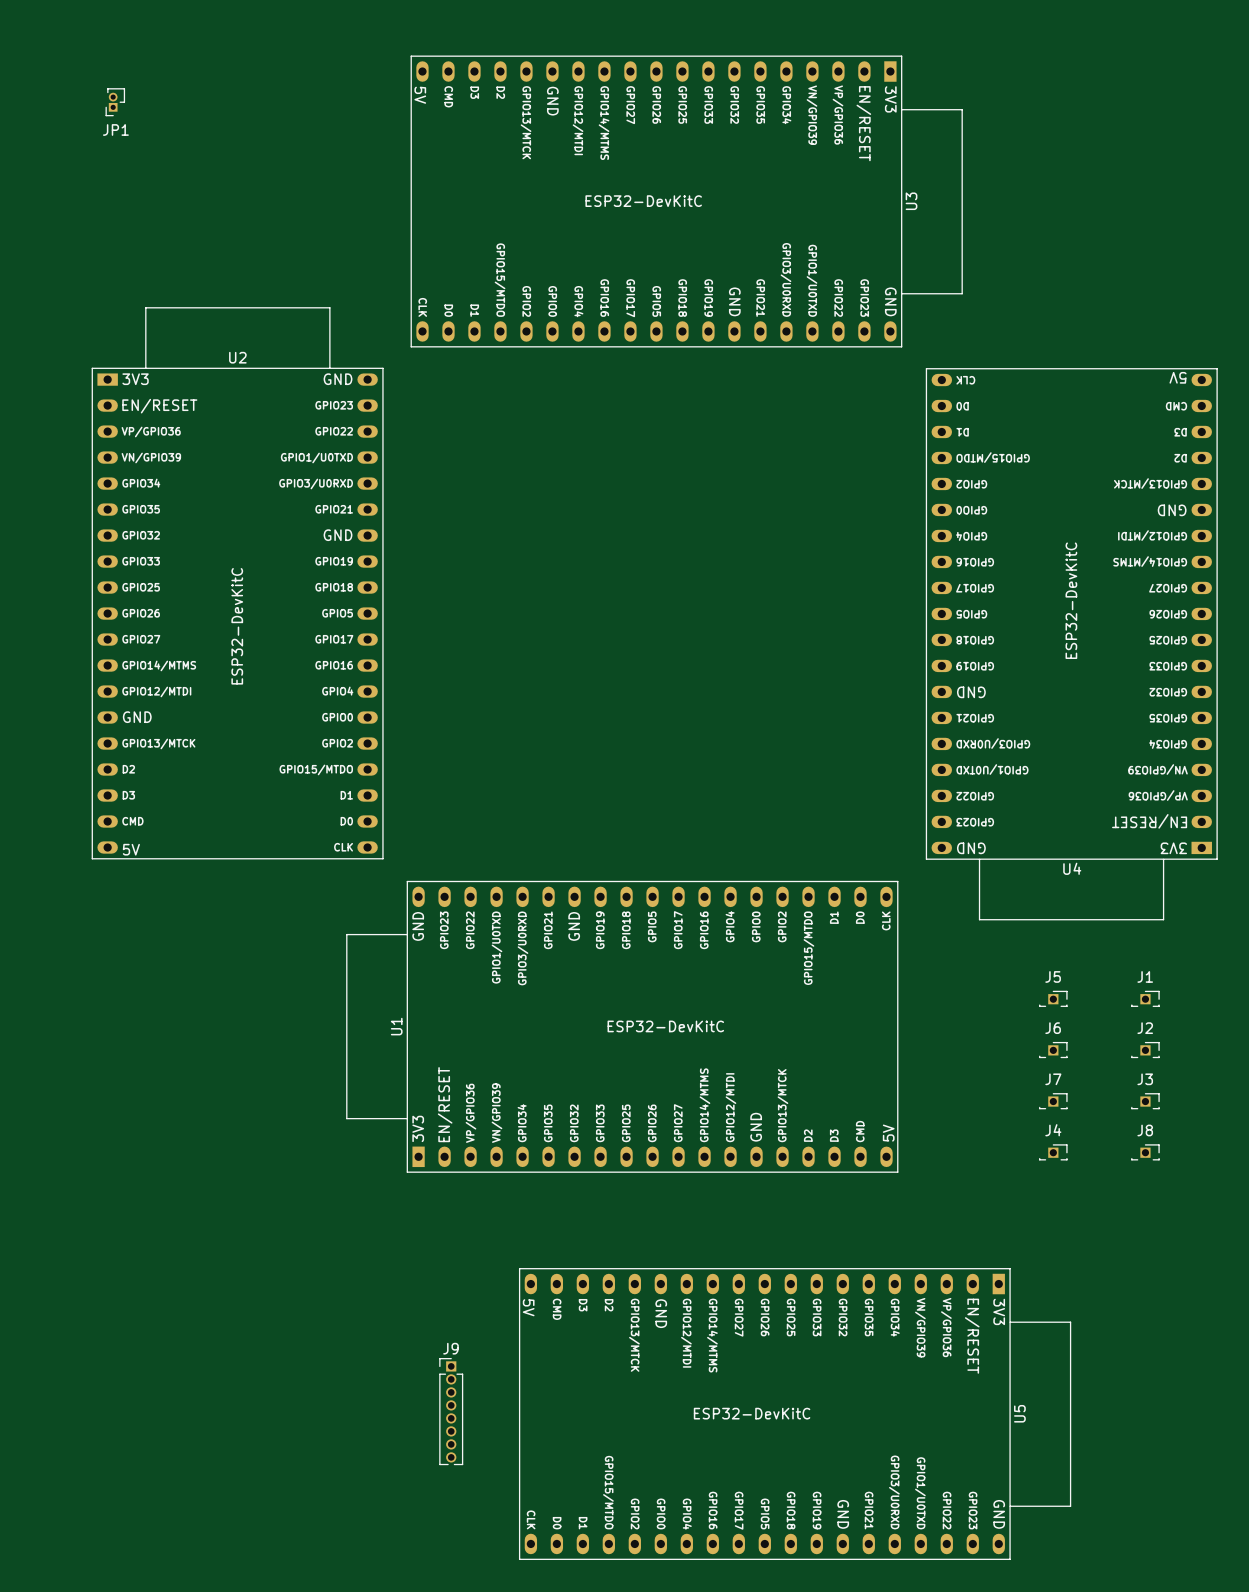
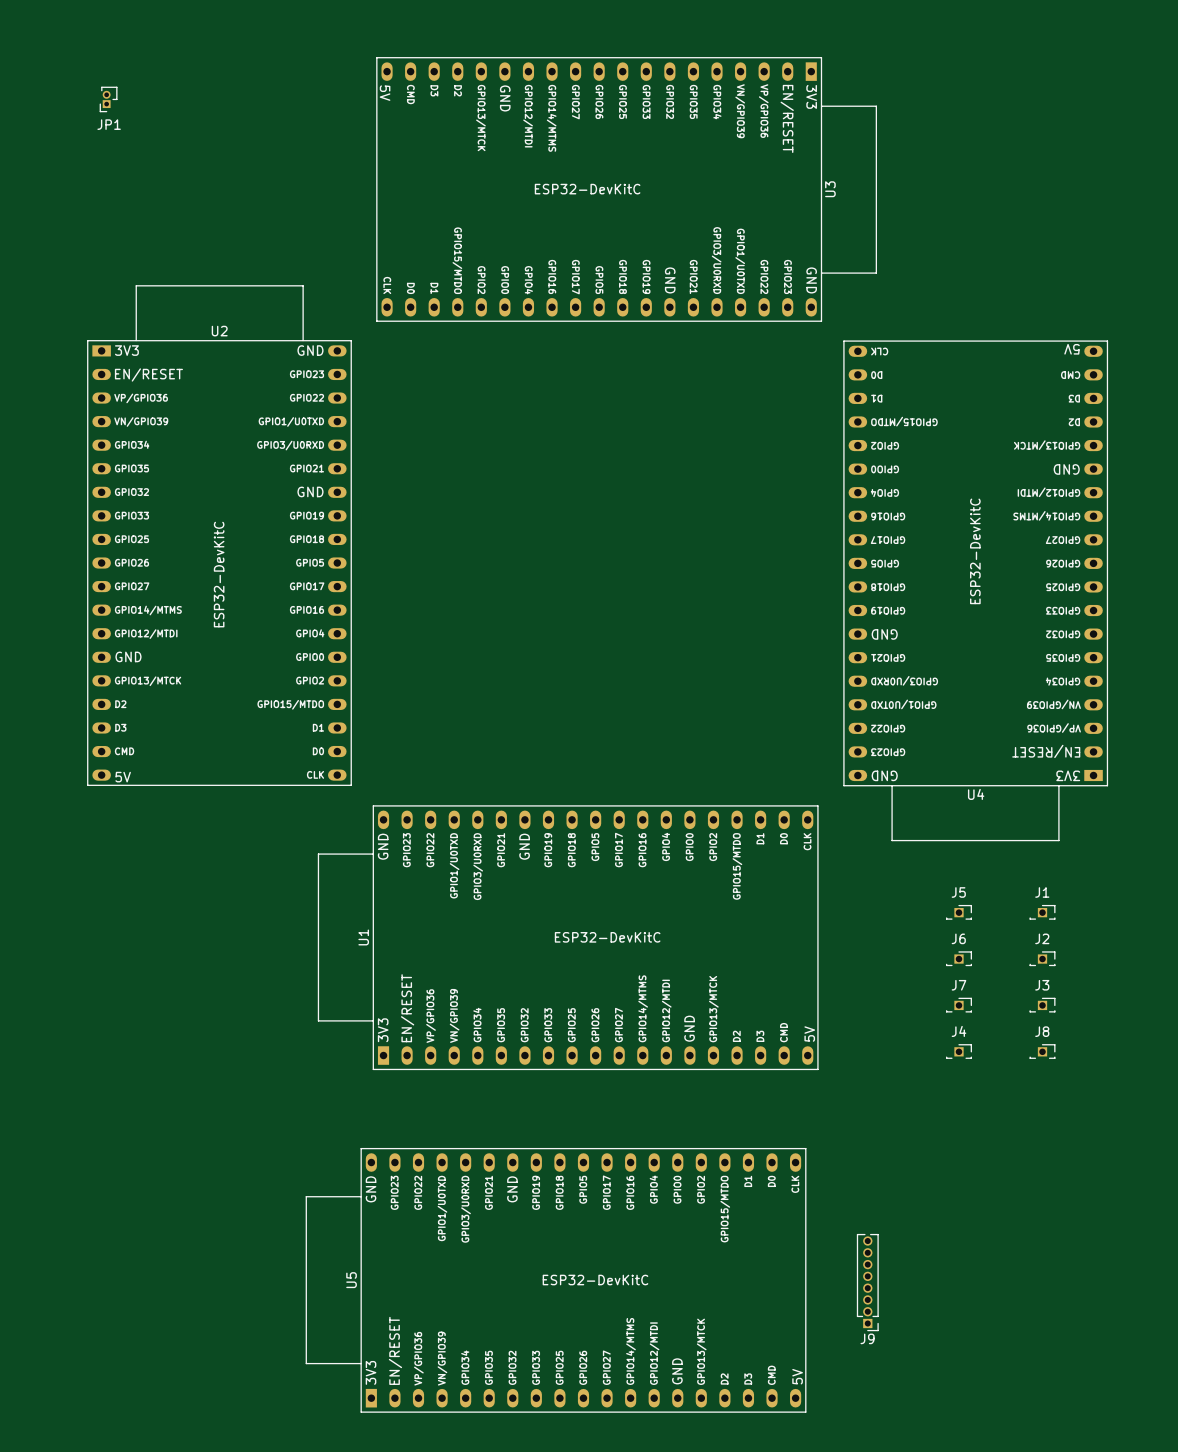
J9 rotation: 0° (451, 1411) -> 180° (867, 1282)
J9 position: (451, 1411) -> (867, 1282)
U5 rotation: 0° (795, 1414) -> 180° (556, 1280)

